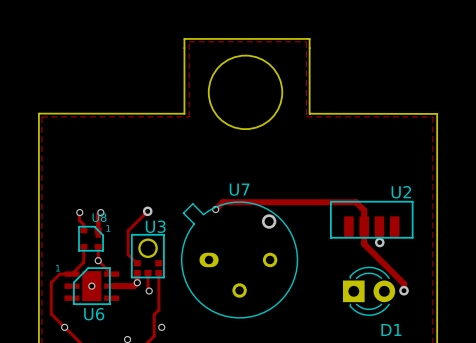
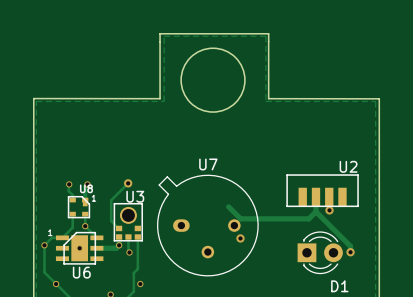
track: (215, 209) (222, 202) (356, 202) (364, 210) (364, 227) -> none
via: (215, 209) -> none
via: (269, 221) -> none
track: none -> (228, 206) (240, 218) (308, 218) (315, 211)
via: none -> (240, 238)
via: none -> (44, 245)

